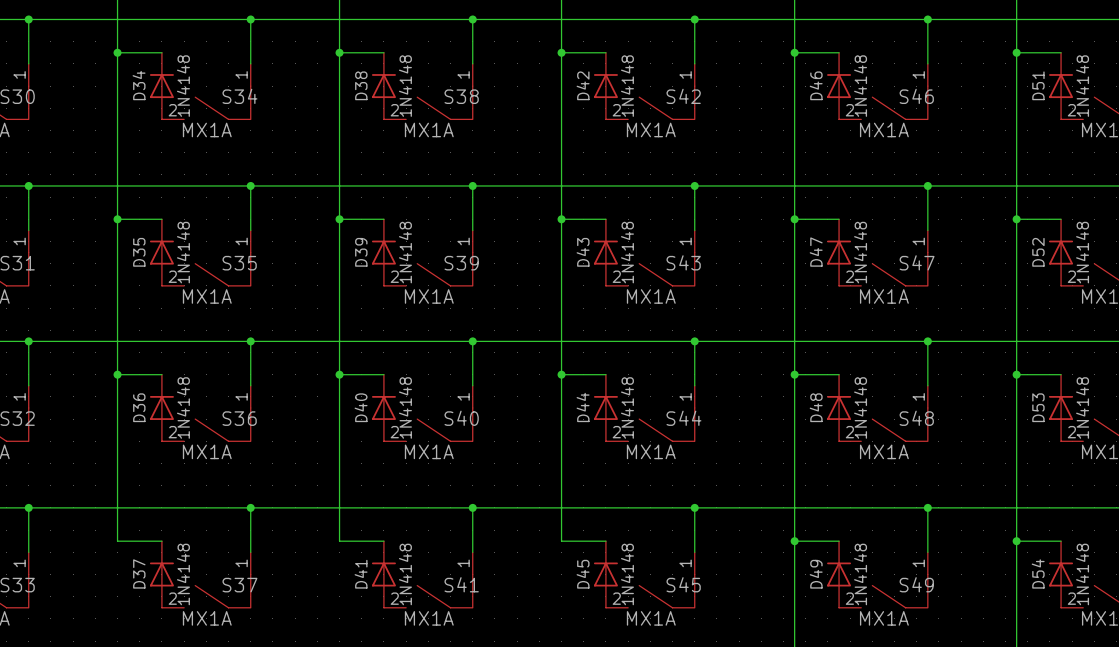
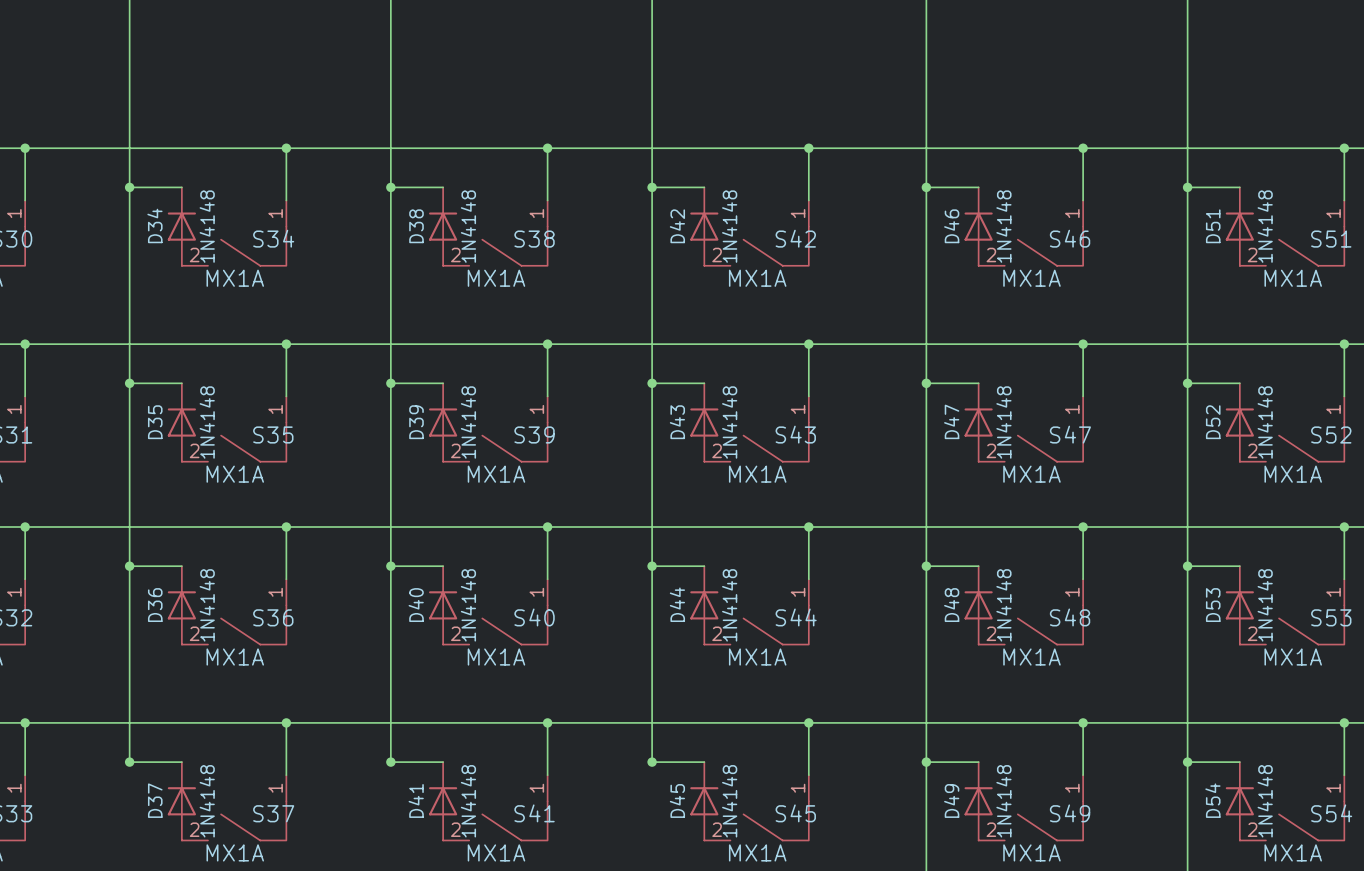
junction: none -> (129, 762)
junction: none -> (390, 762)
junction: none -> (652, 762)

